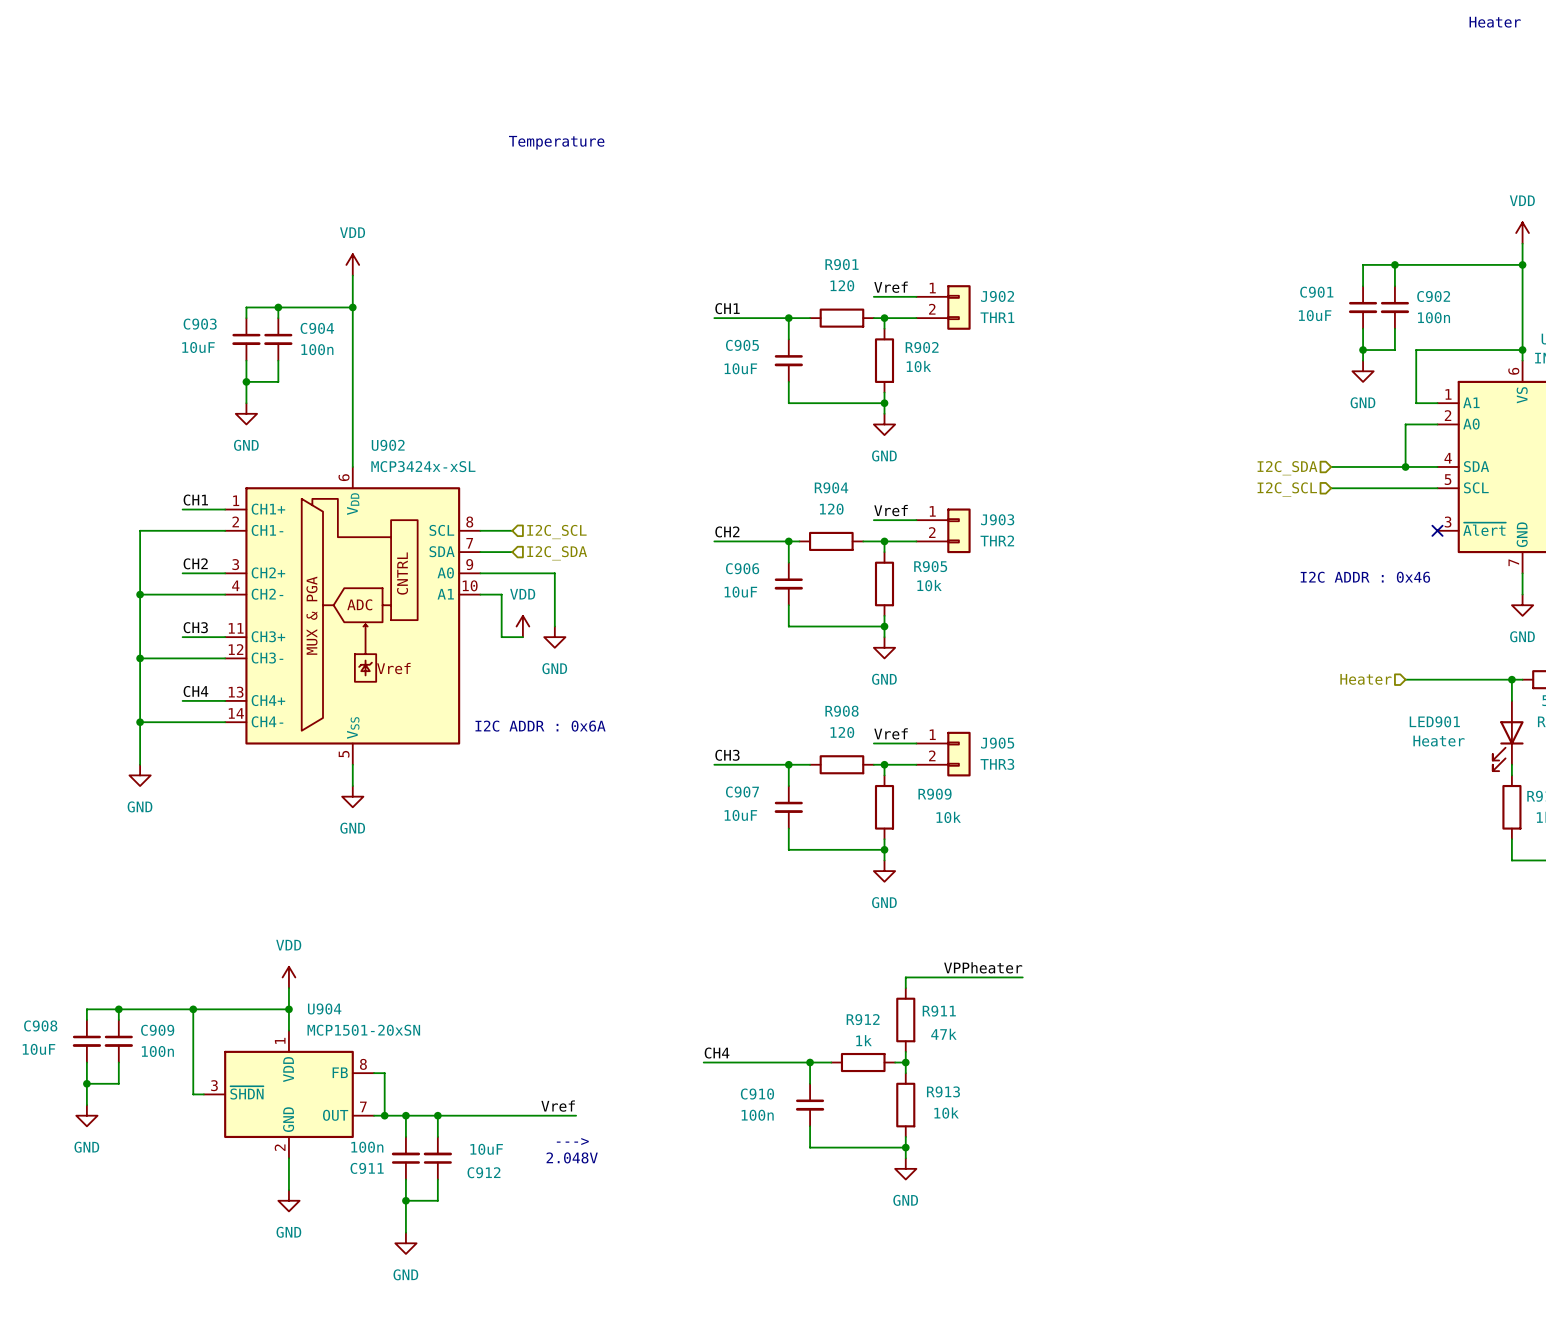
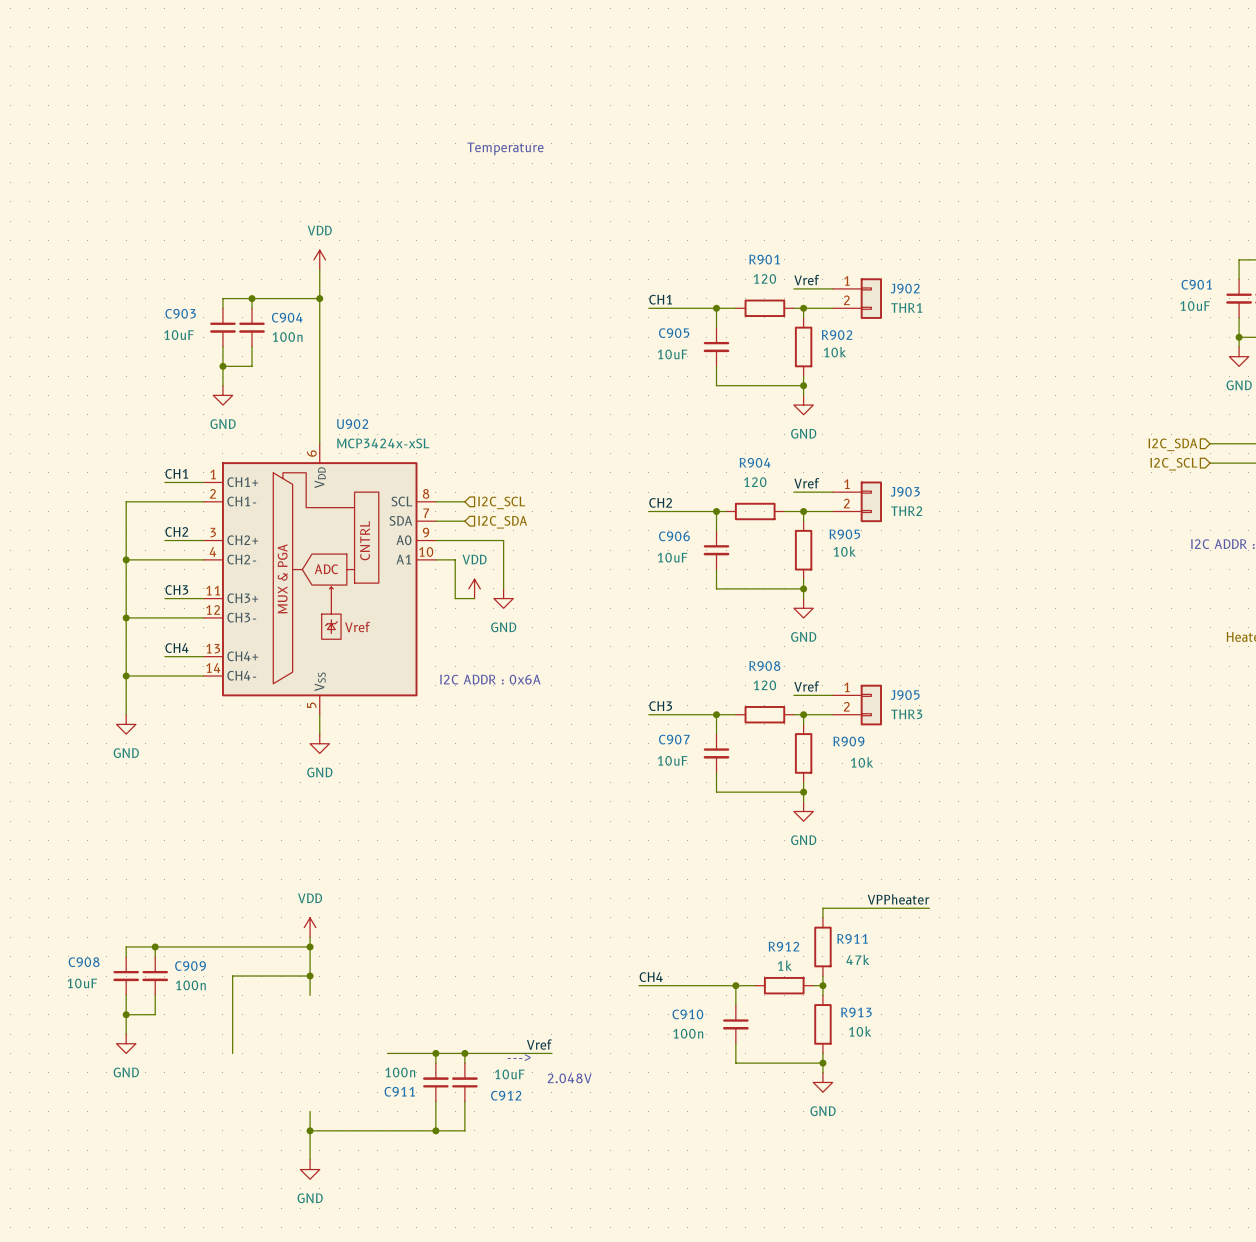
power symbol position: VDD (288, 977) -> VDD (310, 927)
wire: (288, 988) (288, 1030) -> none
wire: (118, 1009) (118, 1019) -> (155, 946) (155, 956)
junction: (118, 1009) -> none
wire: (193, 1009) (193, 1094) (203, 1094) -> none
junction position: (193, 1009) -> (155, 946)
wire: (288, 1009) (86, 1009) (86, 1019) -> (310, 946) (126, 946) (126, 956)
junction: (288, 1009) -> none
wire: none -> (310, 937) (310, 995)
junction: none -> (310, 946)
C908 position: (86, 1041) -> (126, 976)
C909 position: (118, 1041) -> (155, 976)
junction: none -> (310, 976)
wire: (86, 1062) (86, 1105) -> (126, 995) (126, 1034)
wire: (118, 1062) (118, 1083) (86, 1083) -> (155, 995) (155, 1014) (126, 1014)
wire: (374, 1073) (384, 1073) (384, 1115) -> none
junction: (86, 1083) -> none
junction: none -> (126, 1014)
U904: MCP1501-20xSN (288, 1094) -> none
label position: Vref (558, 1106) -> Vref (539, 1044)
power symbol position: GND (86, 1115) -> GND (126, 1043)
wire: (374, 1115) (576, 1115) -> none
junction: (384, 1115) -> none
wire: (405, 1115) (405, 1136) -> none
junction: (405, 1115) -> none
wire: (437, 1115) (437, 1136) -> none
junction: (437, 1115) -> none
wire: none -> (387, 1053) (551, 1053)
wire: none -> (435, 1053) (435, 1063)
junction: none -> (435, 1053)
wire: none -> (464, 1053) (464, 1063)
junction: none -> (464, 1053)
text position: 2.048V (572, 1157) -> 2.048V (569, 1078)
wire: (288, 1158) (288, 1190) -> (435, 1101) (435, 1130)
C911 position: (405, 1158) -> (435, 1082)
C912 position: (437, 1158) -> (464, 1082)
wire: (405, 1179) (405, 1232) -> (310, 1111) (310, 1159)
wire: (437, 1179) (437, 1200) (405, 1200) -> none
wire: none -> (464, 1101) (464, 1130) (310, 1130)
power symbol: GND (288, 1200) -> none
junction: (405, 1200) -> none
junction: none -> (310, 1130)
junction: none -> (435, 1130)
power symbol: GND (405, 1243) -> none
power symbol: none -> GND (310, 1169)

